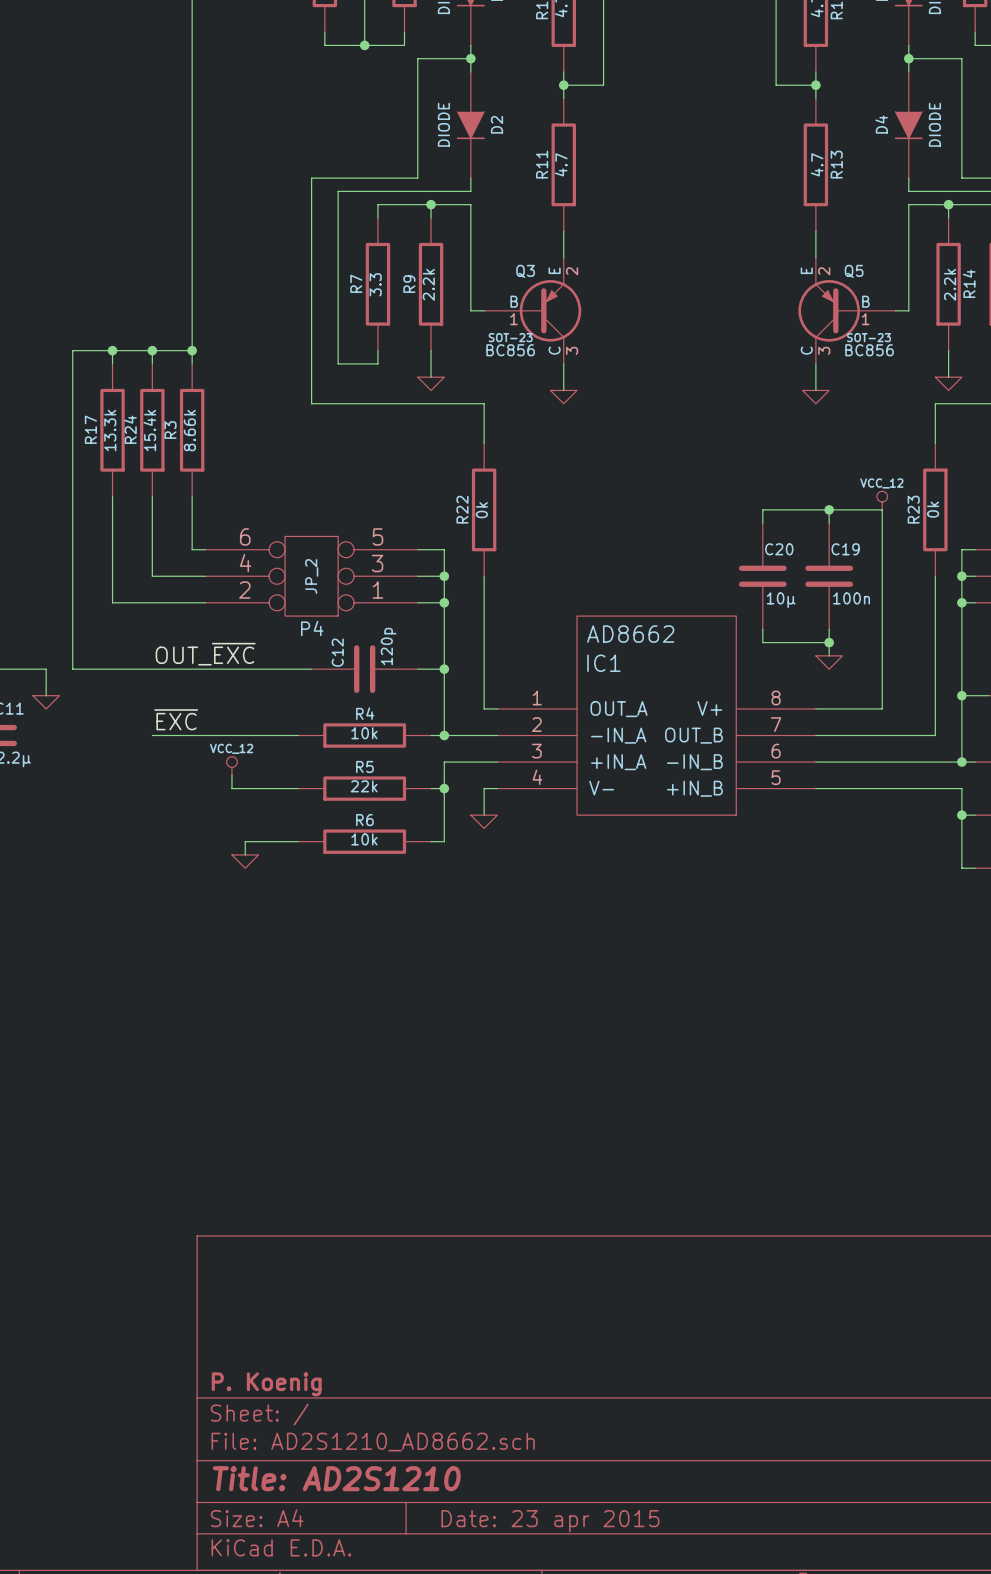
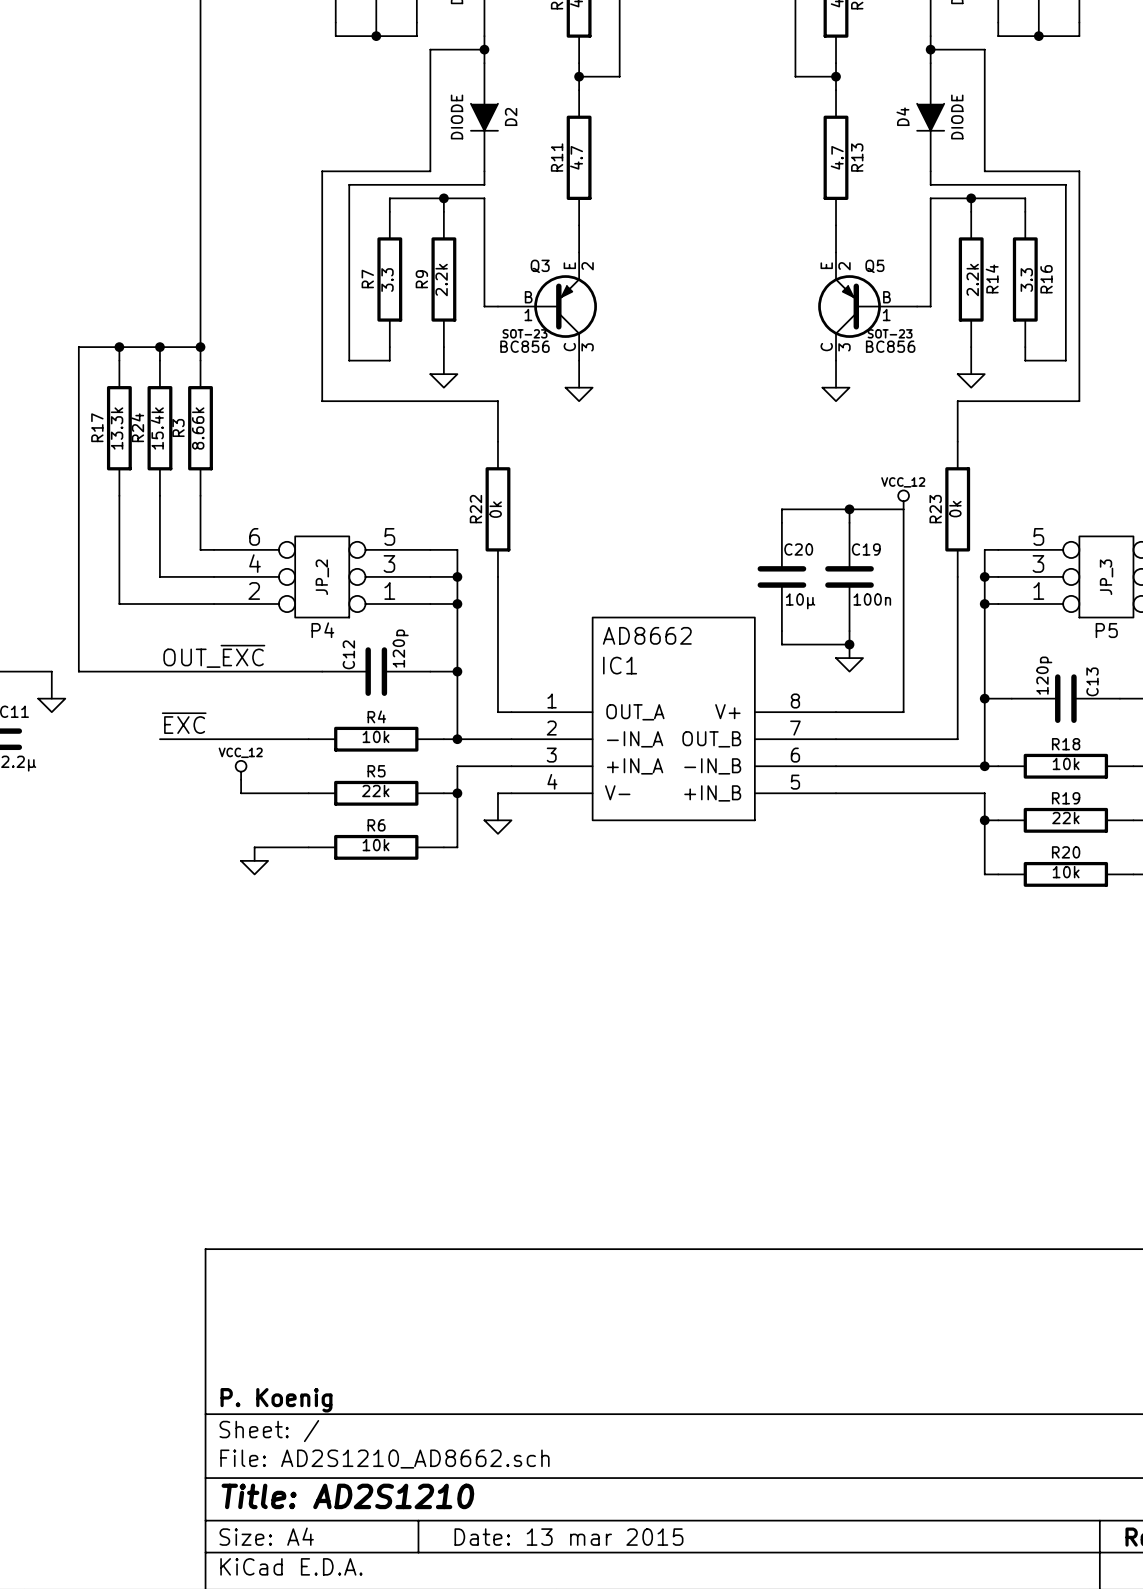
title block: Date: 23 apr 2015 (550, 1521) -> Date: 13 mar 2015 (568, 1537)

